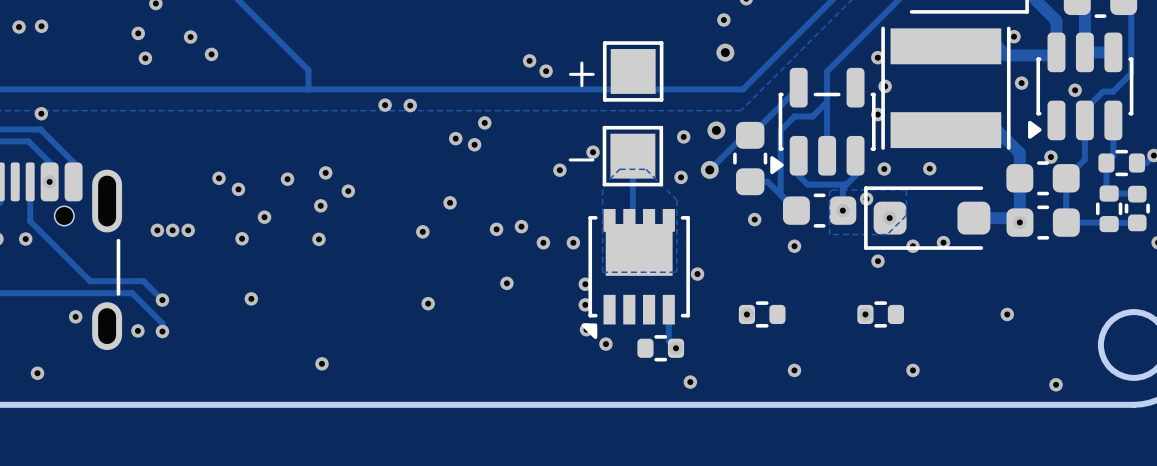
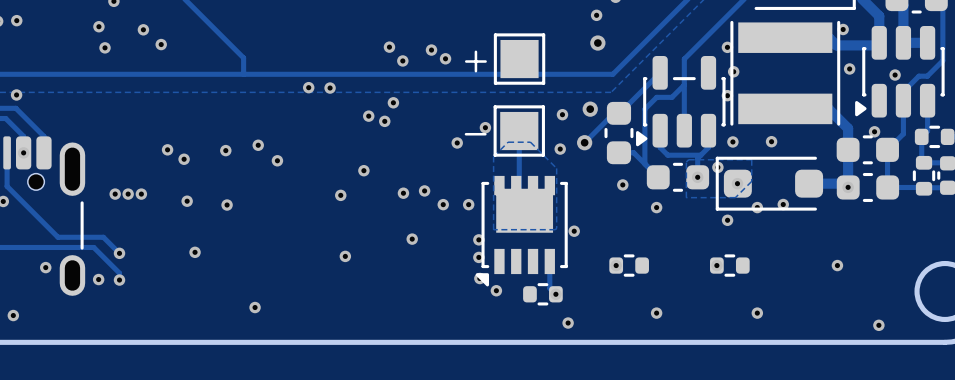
via: none -> (389, 47)
via: none -> (402, 60)
via: (320, 205) -> none
via: (264, 217) -> none
via: (318, 239) -> none
via: none -> (227, 205)

